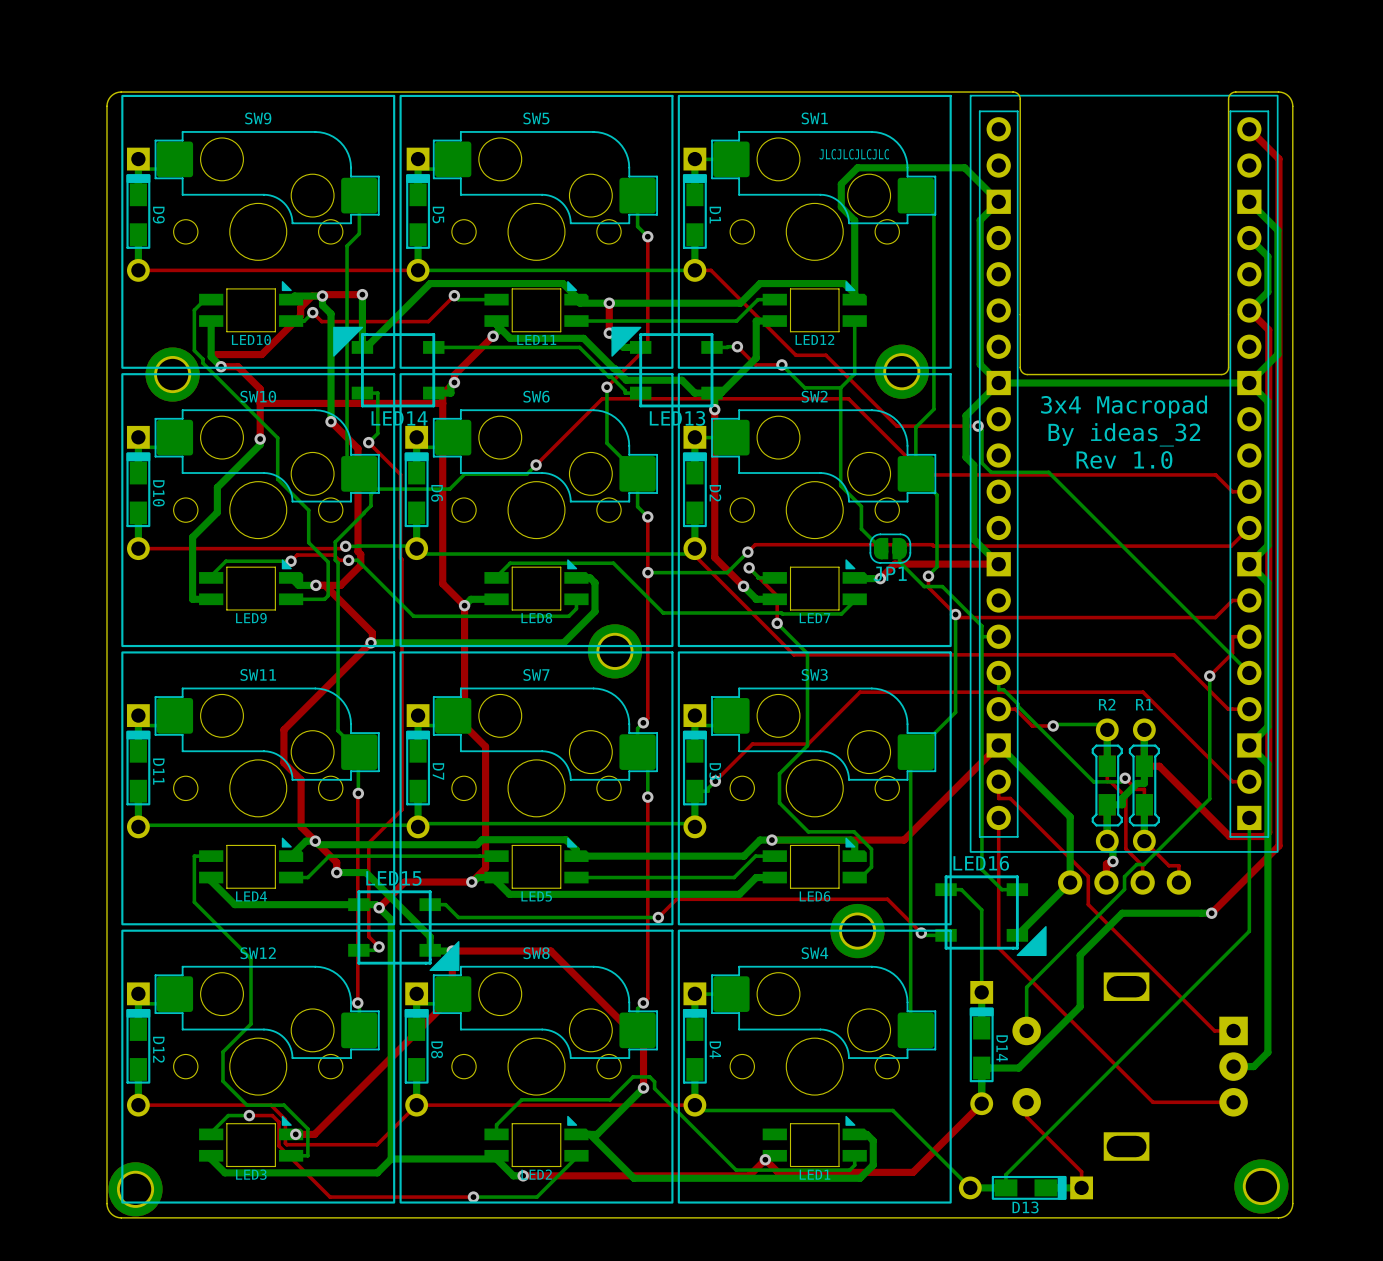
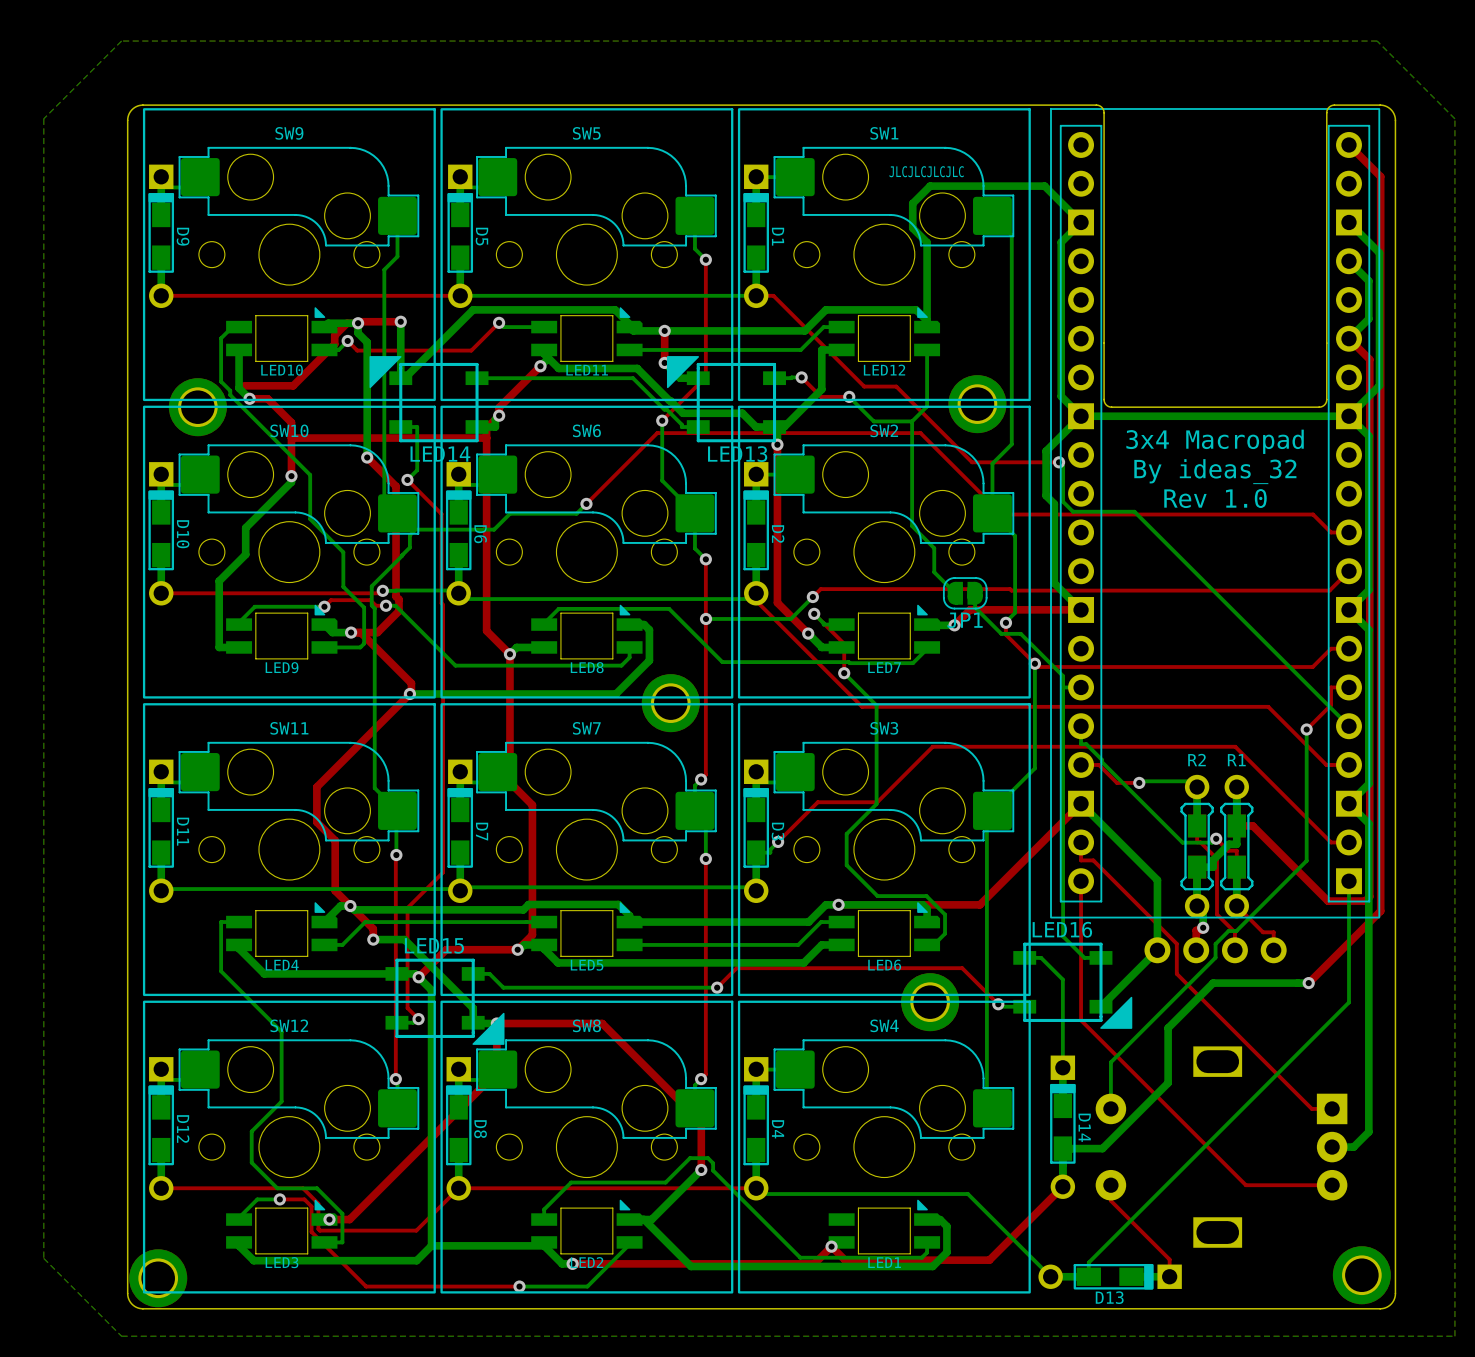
bottom zone outline: none -> (1377, 41) (1454, 118) (1454, 1336) (121, 1336) (43, 1258) (43, 118) (121, 41) (1377, 41)

